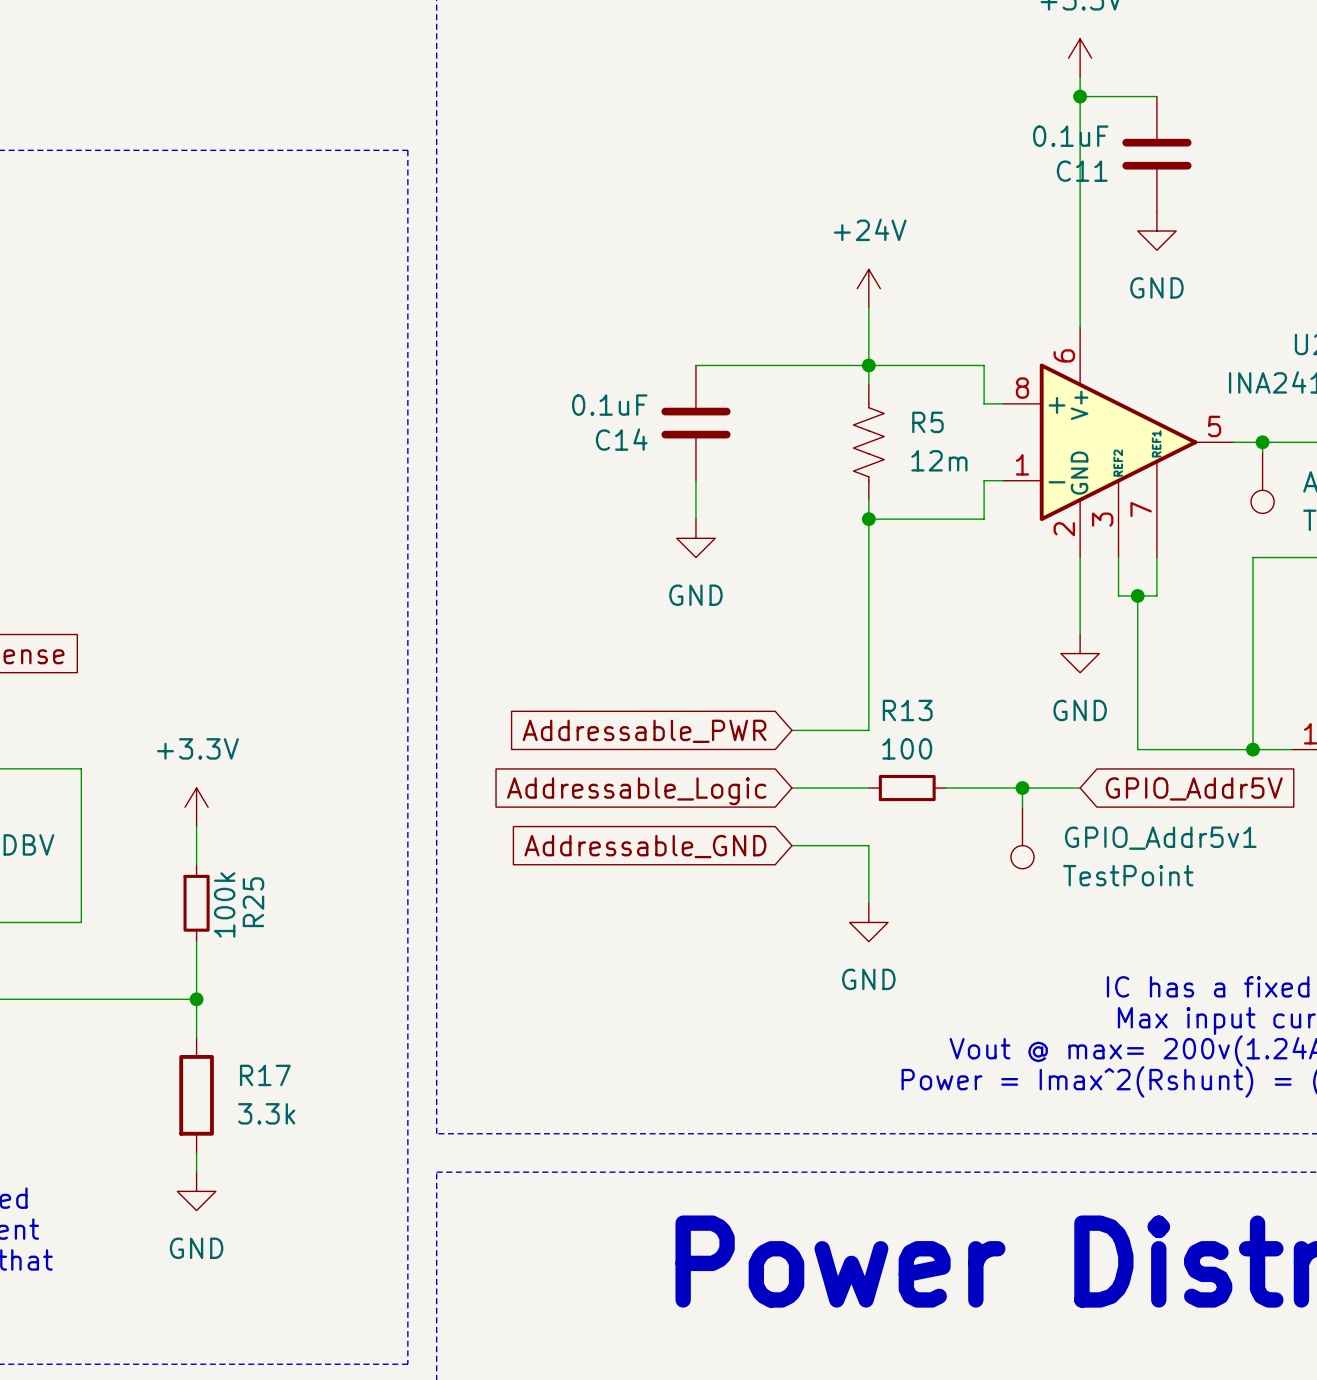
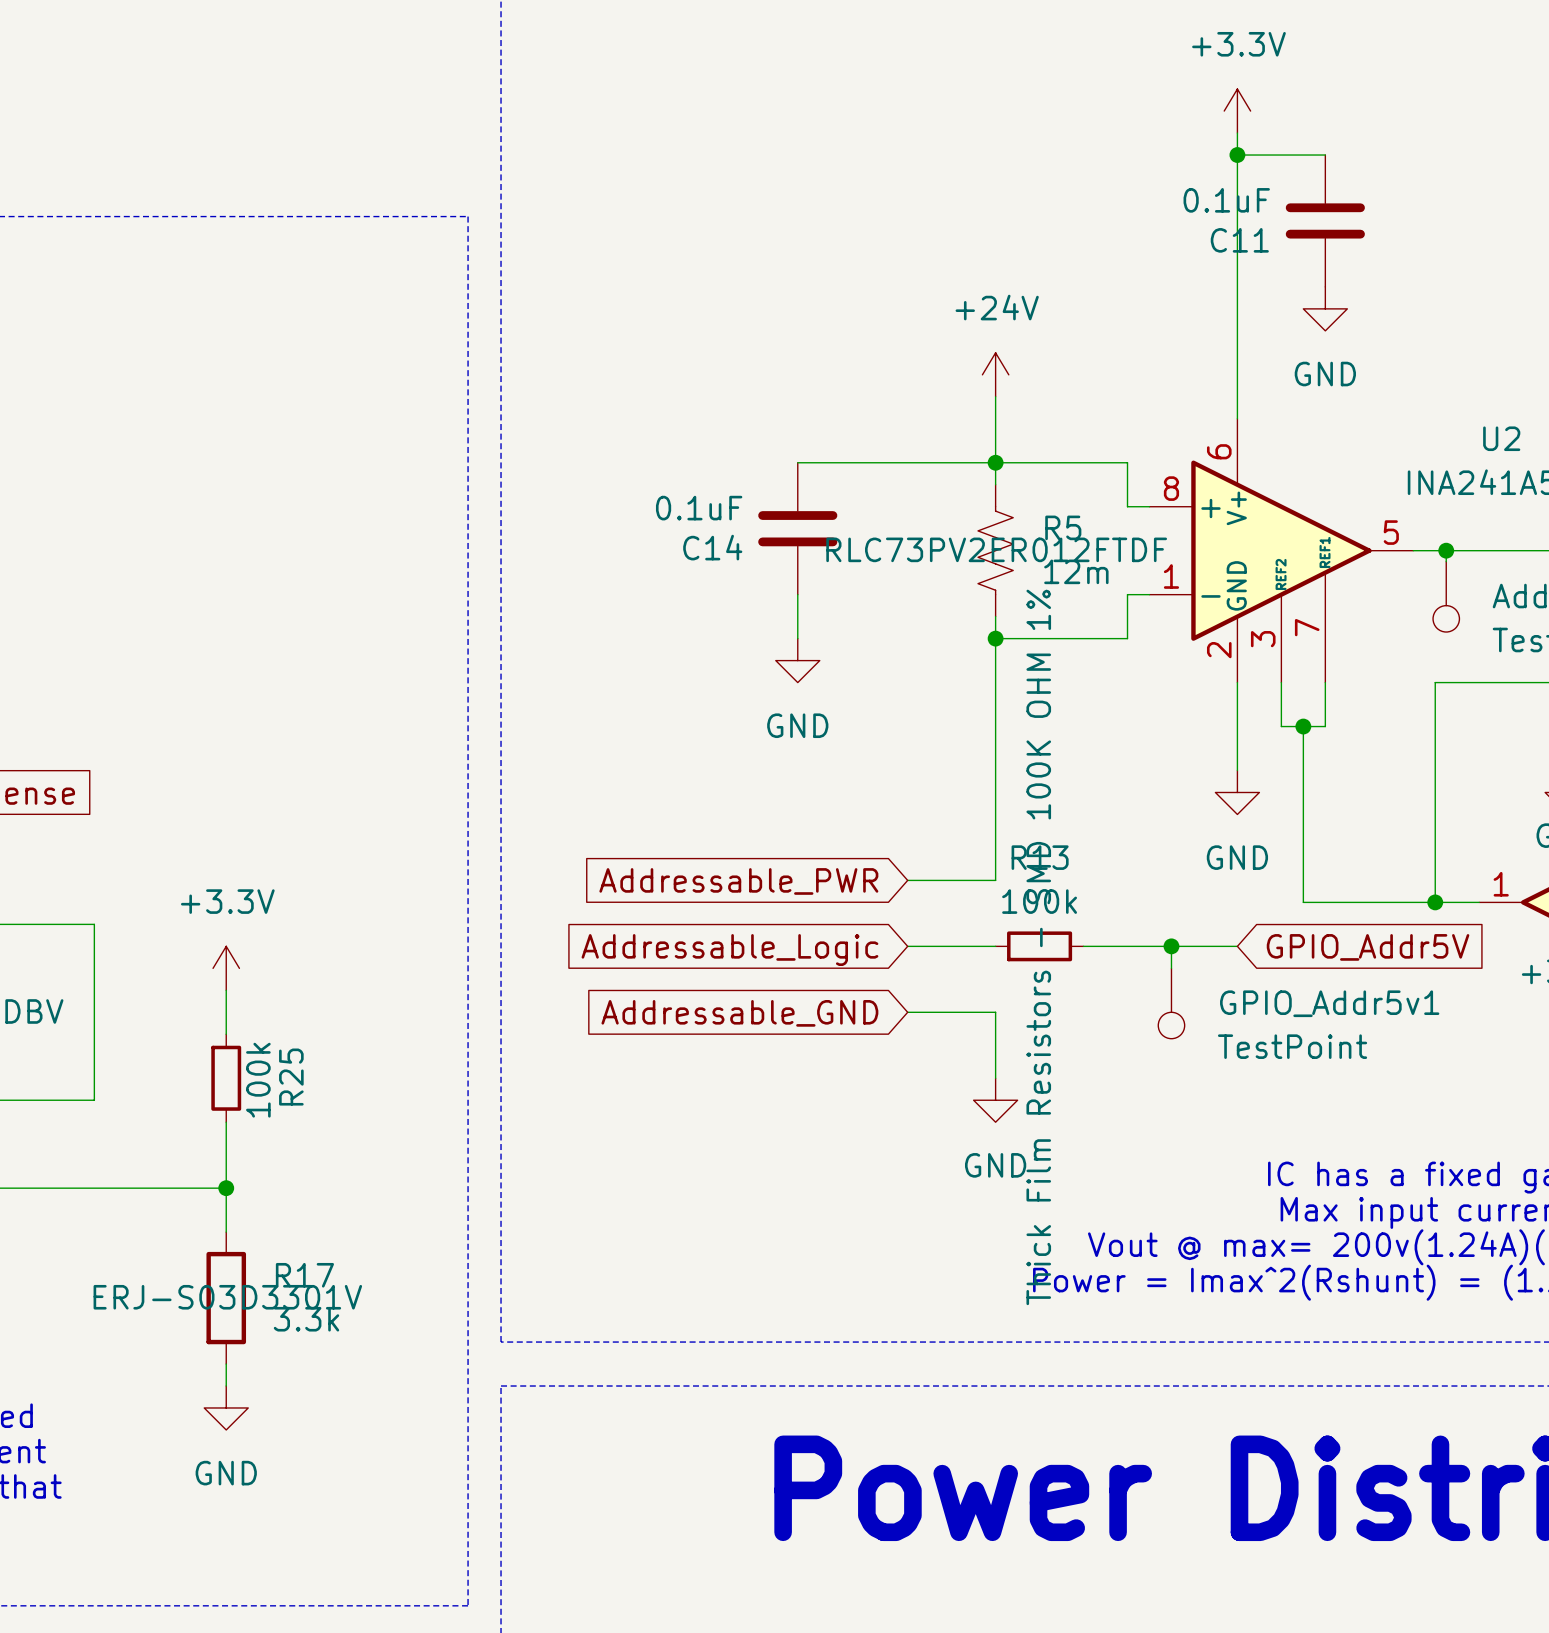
R5 text: none -> RLC73PV2ER012FTDF (996, 549)
R13 value: 100 (907, 748) -> 100k (1039, 901)
R13 text: none -> Thick Film Resistors - SMD 100K OHM 1% (1038, 947)
R17 text: none -> ERJ-S03D3301V (227, 1297)

